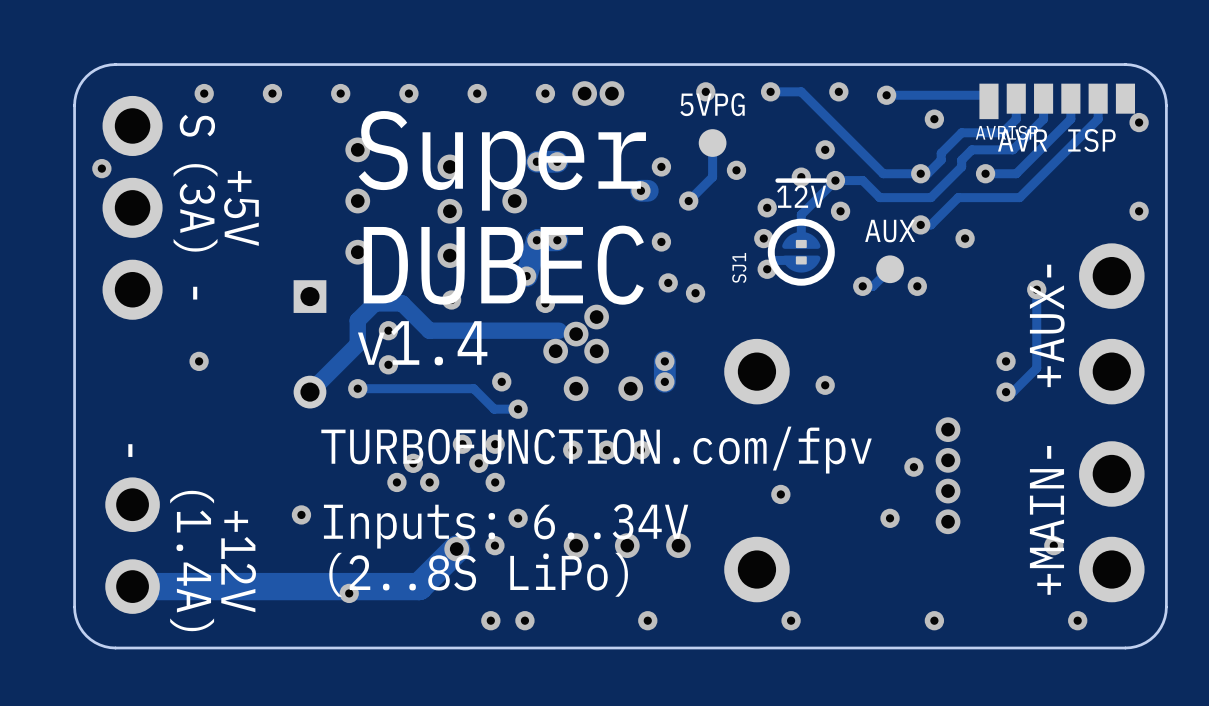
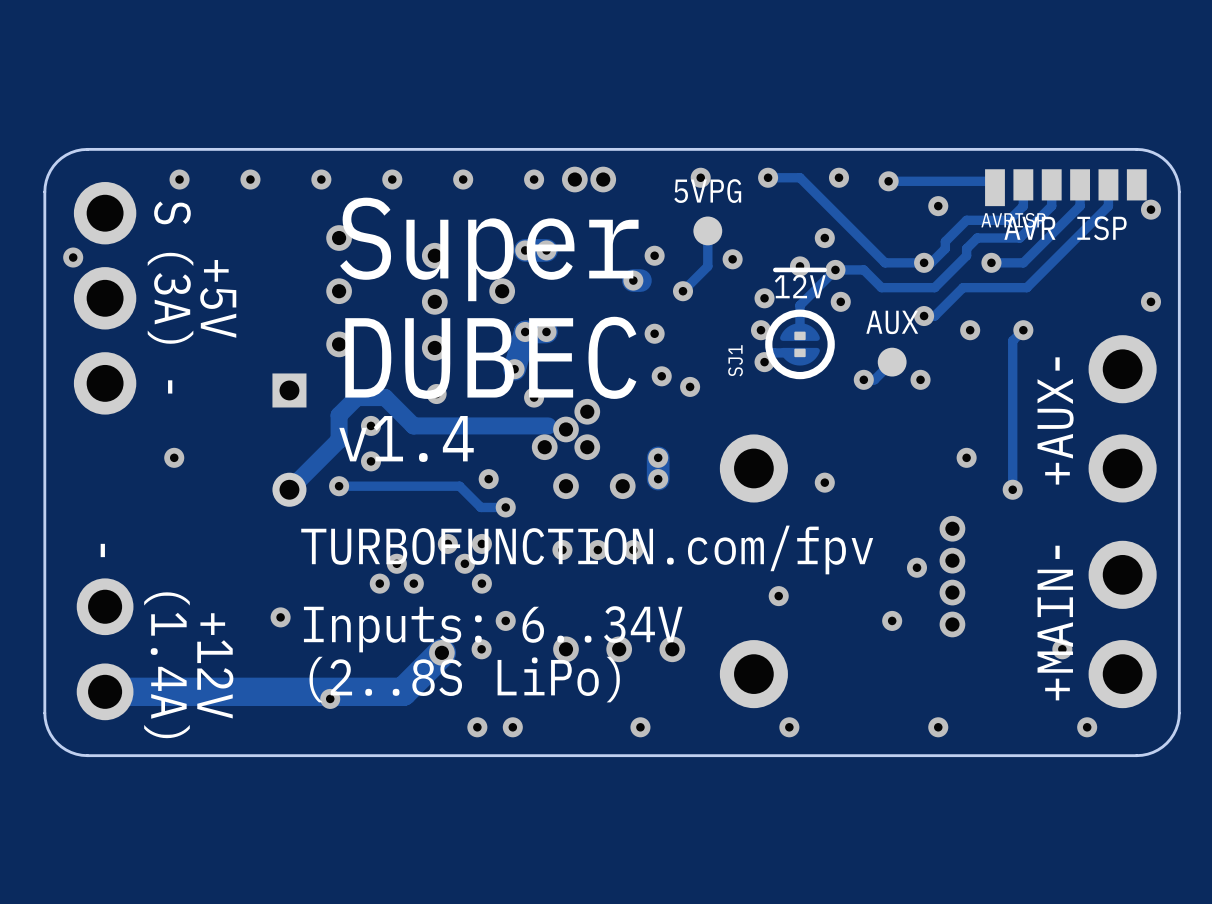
via: none -> (1023, 330)
track: (1036, 289) (1036, 368) (1012, 392) (1006, 392) -> (1023, 330) (1012, 340) (1012, 489)
via: (1036, 289) -> none
via position: (1006, 361) -> (966, 457)

